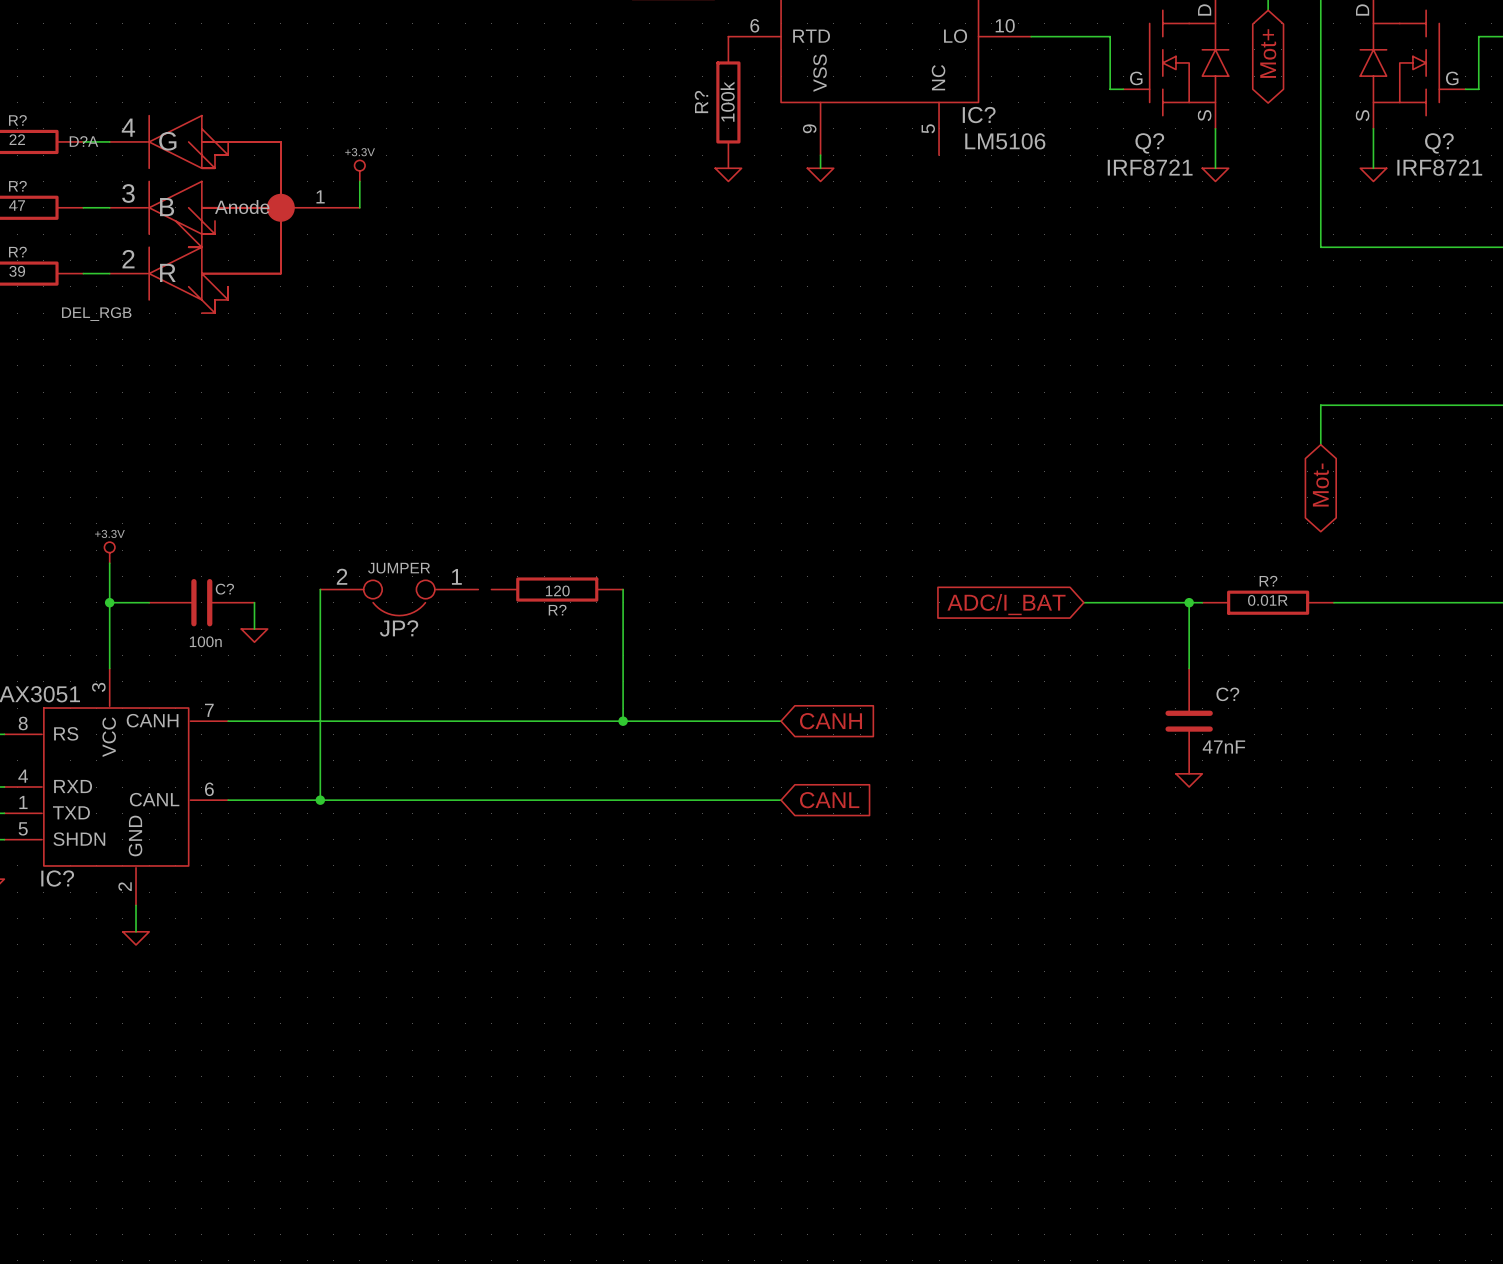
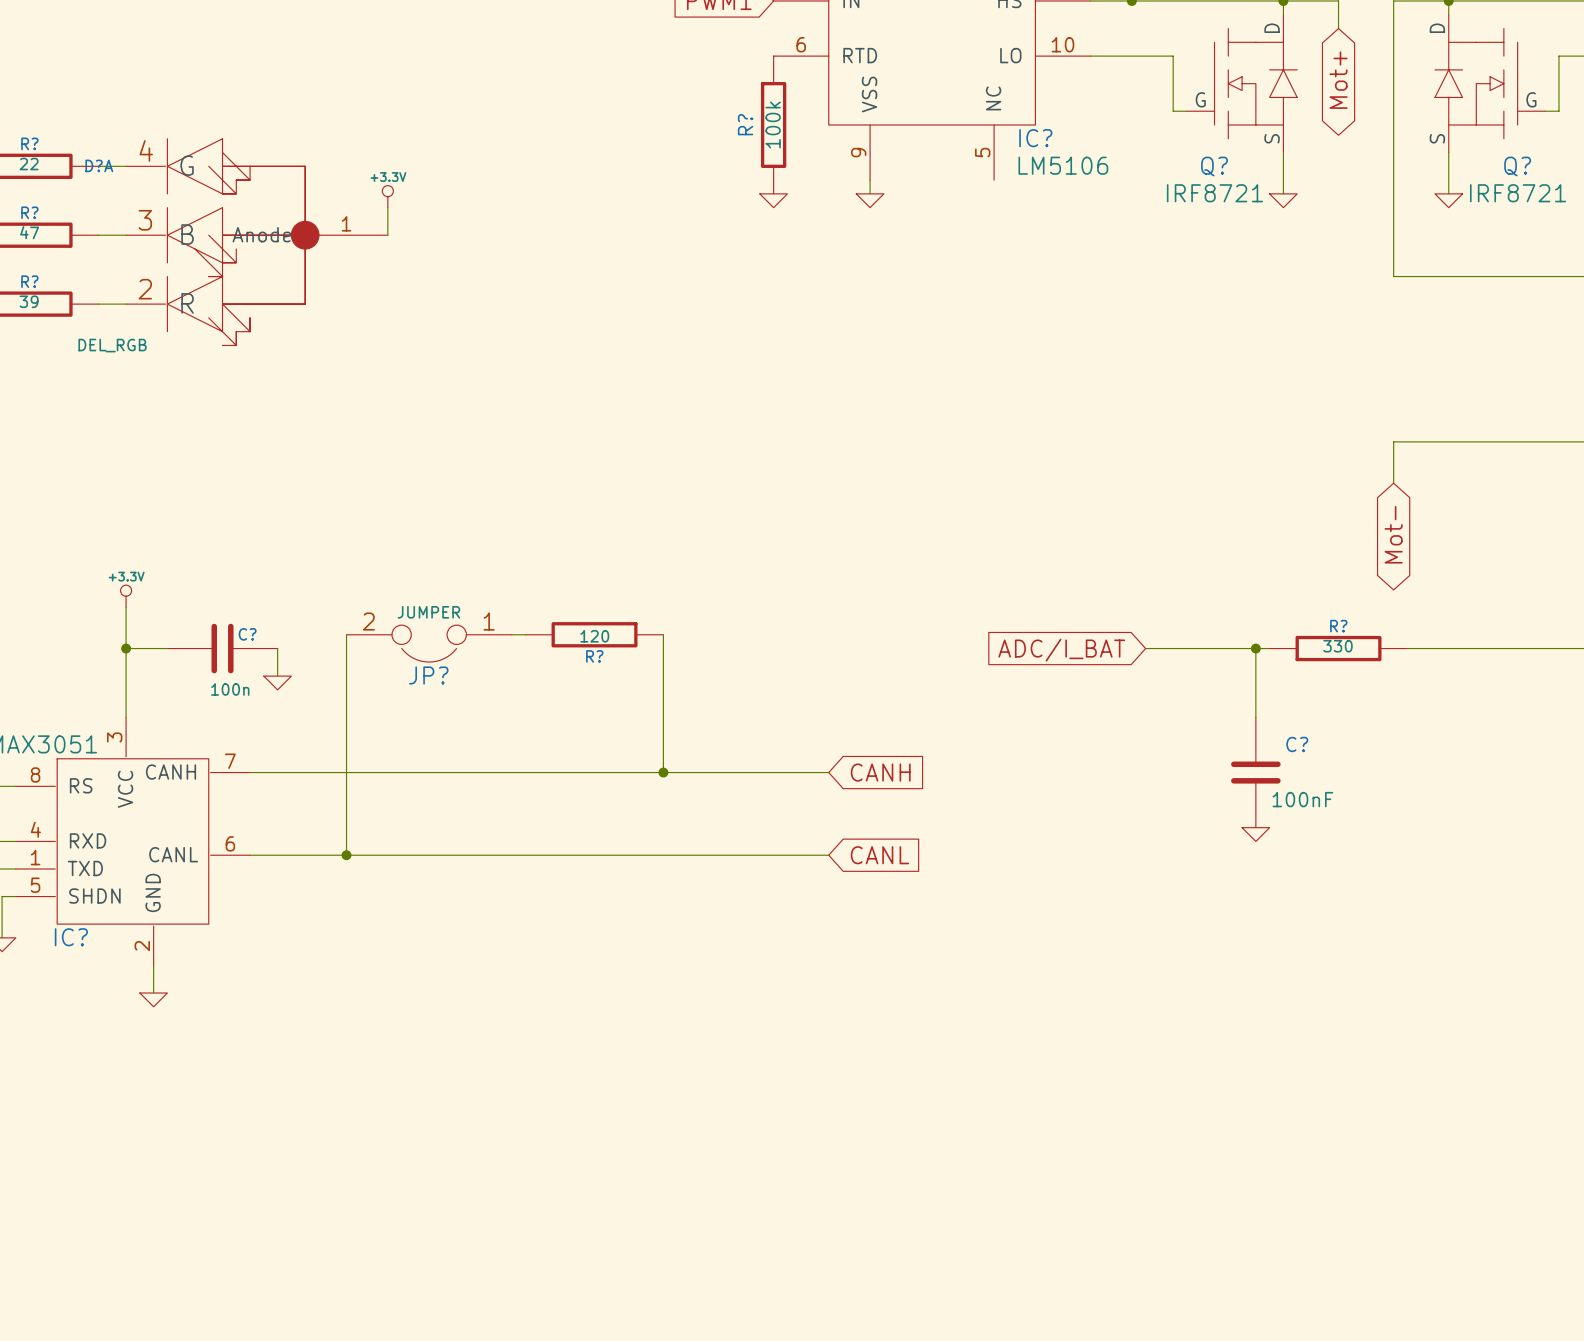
wire: none -> (511, 634) (525, 634)
R? value: 0.01R (1267, 600) -> 330 (1337, 646)
C? value: 47nF (1223, 747) -> 100nF (1302, 799)

